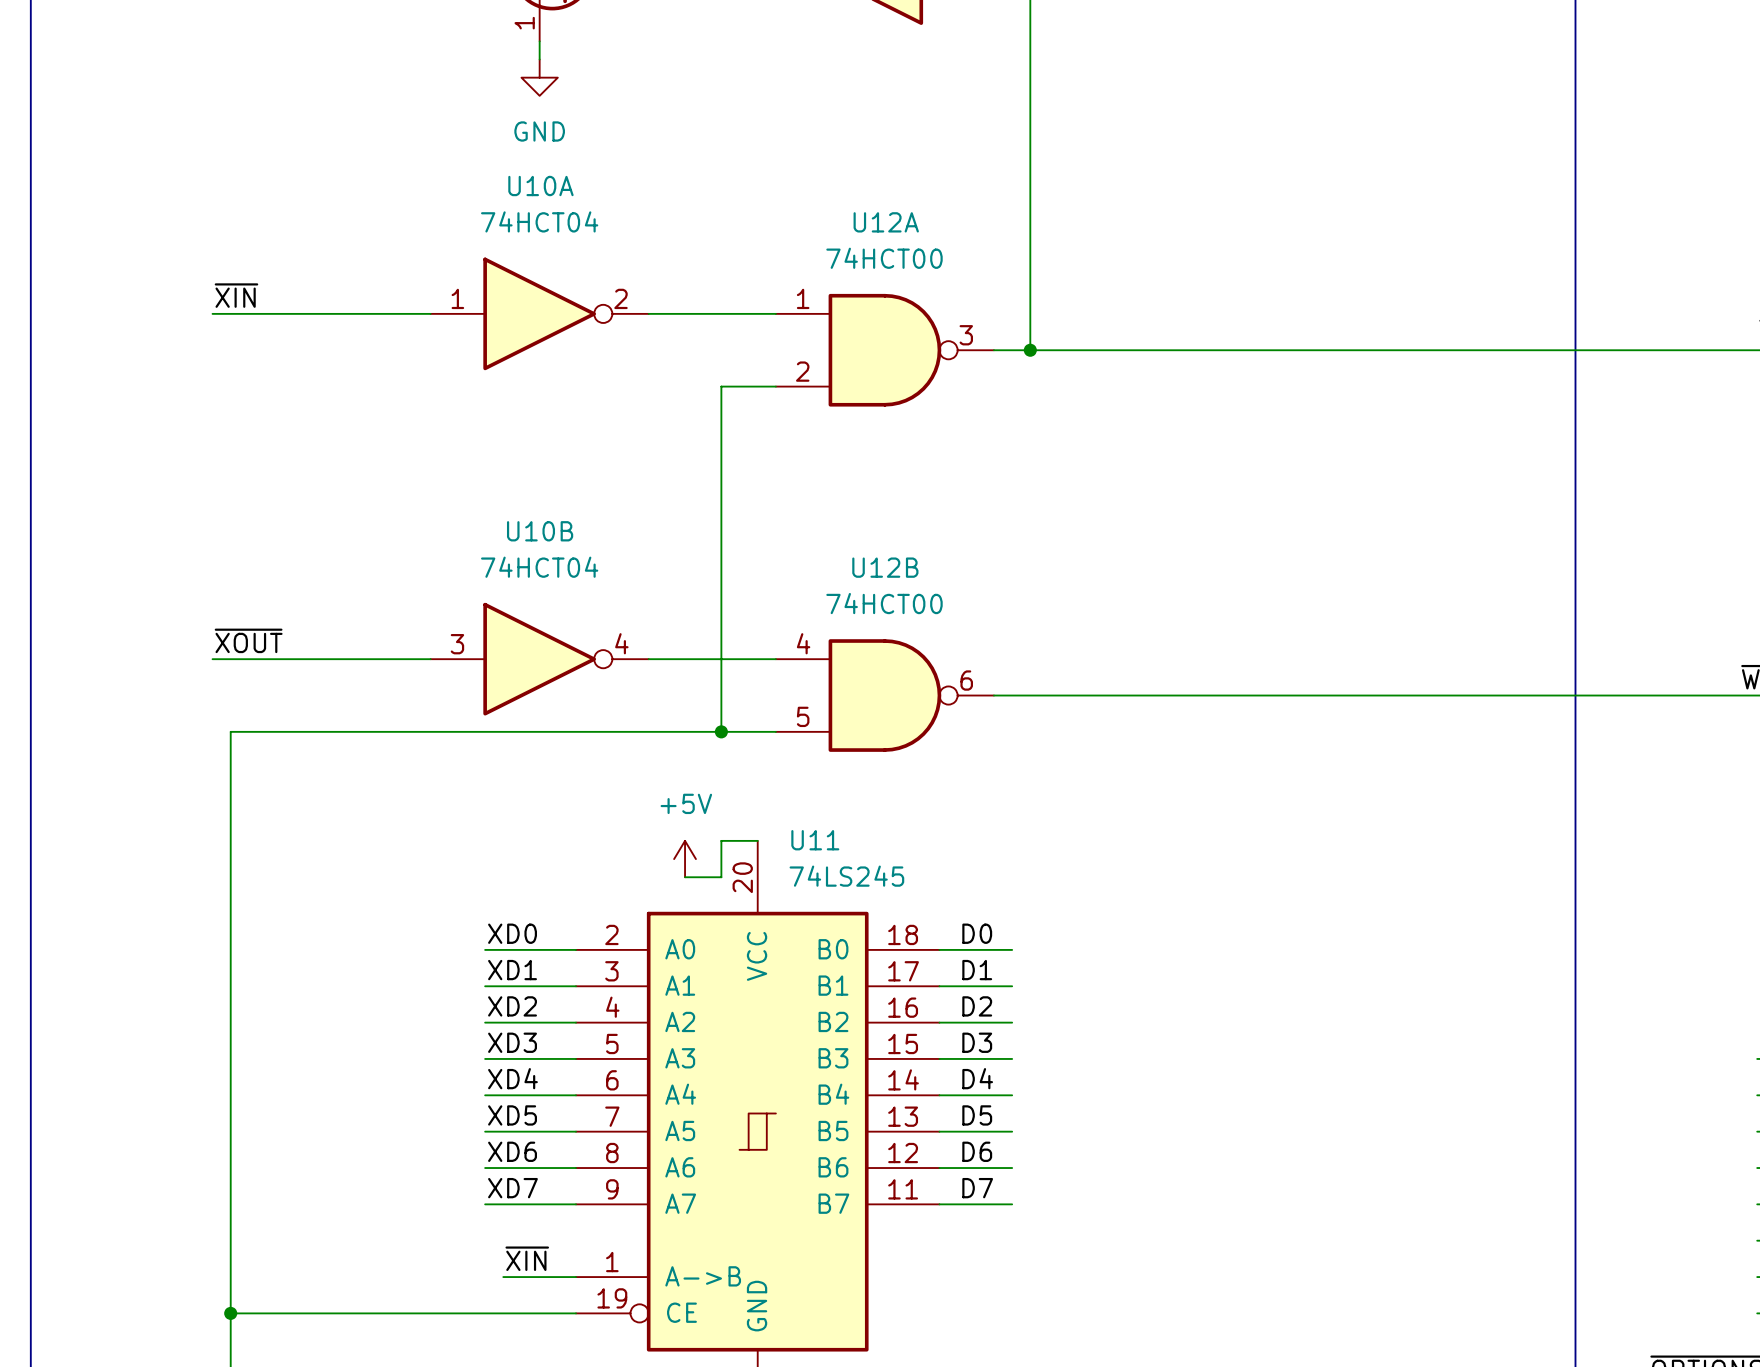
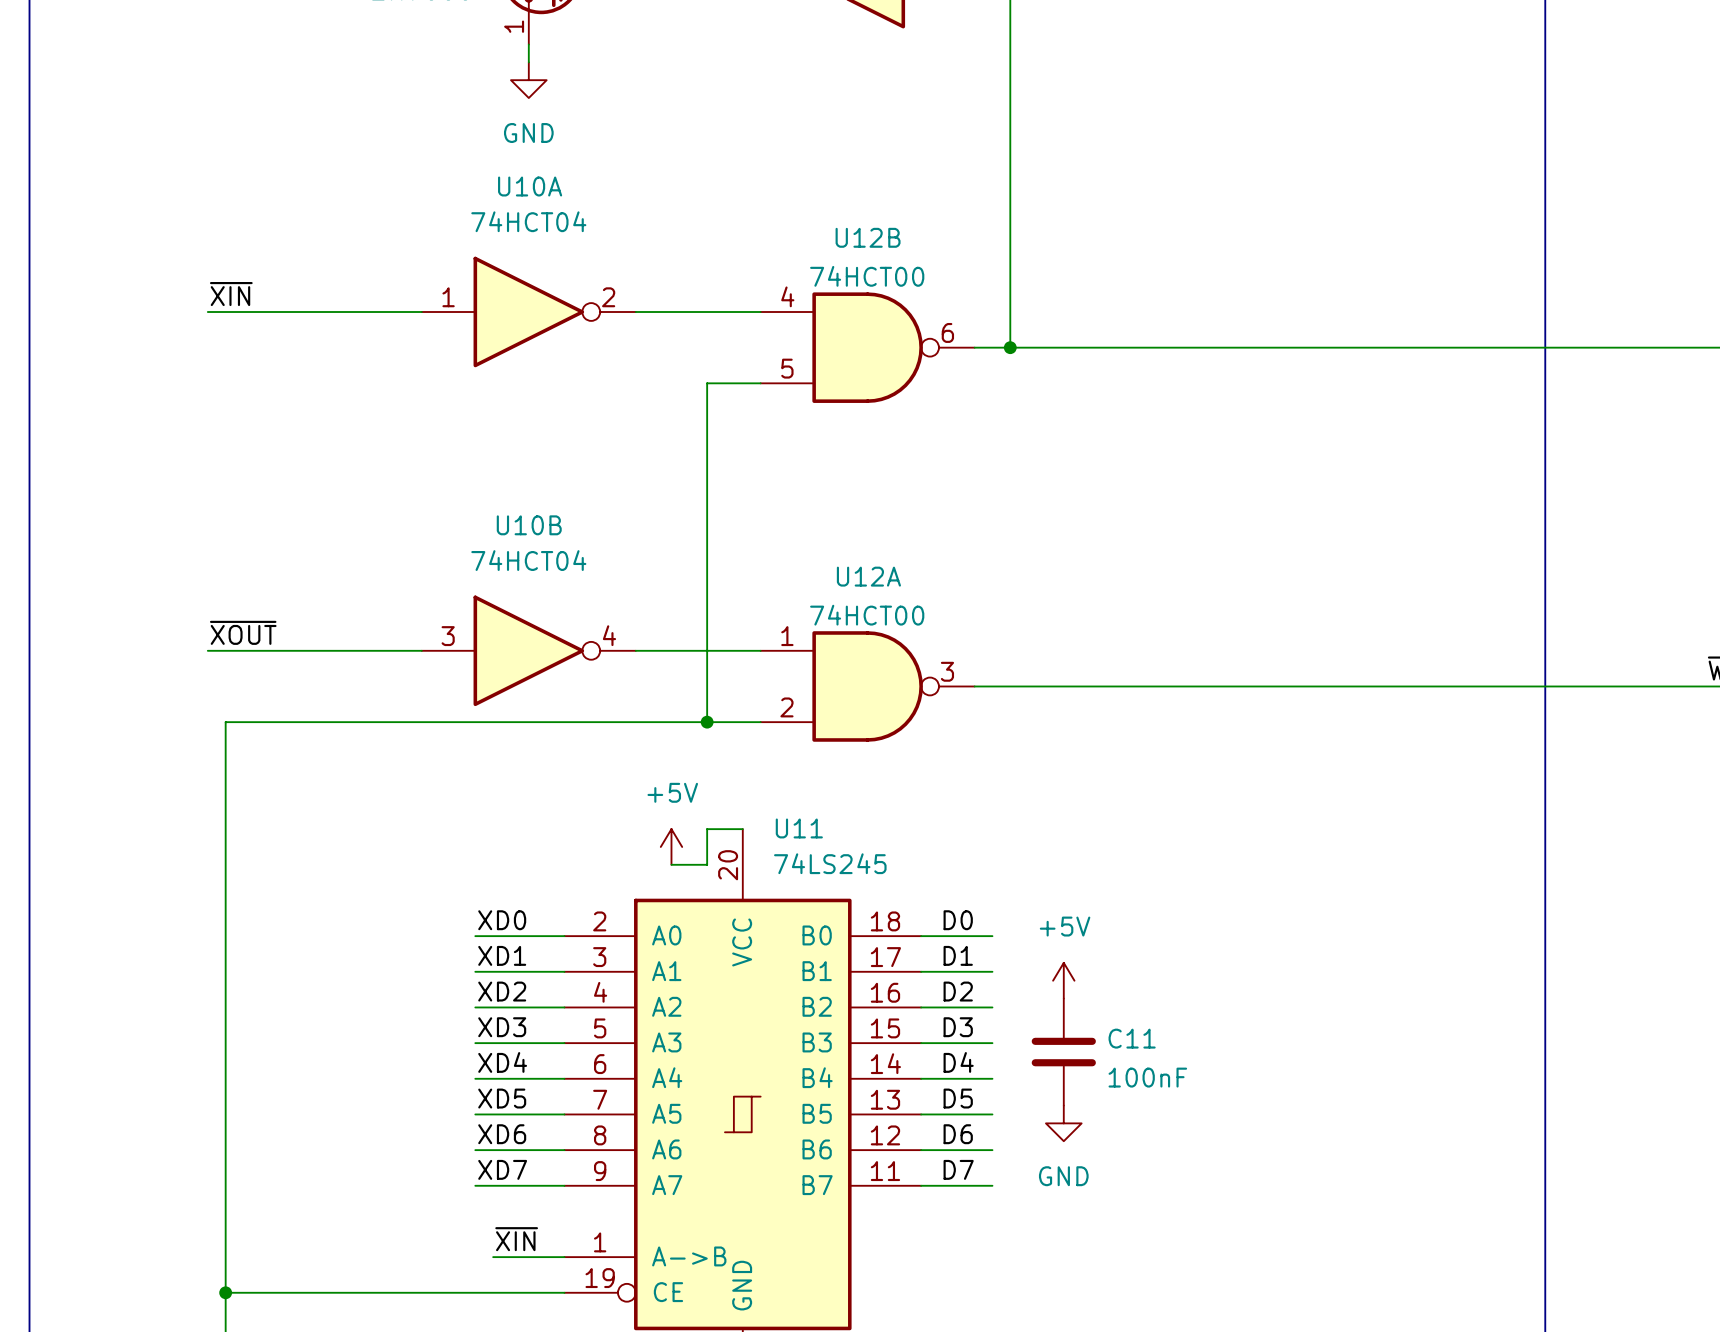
U12A name position: U12A (886, 222) -> U12A (868, 576)
U12A value position: 74HCT00 (884, 258) -> 74HCT00 (867, 615)
U12A position: (884, 350) -> (867, 686)
U12B name position: U12B (885, 567) -> U12B (868, 237)
U12B value position: 74HCT00 (884, 603) -> 74HCT00 (867, 276)
U12B position: (884, 695) -> (867, 347)
power symbol: none -> +5V (1063, 980)
C11: none -> 100nF (1063, 1052)
power symbol: none -> GND (1063, 1123)

